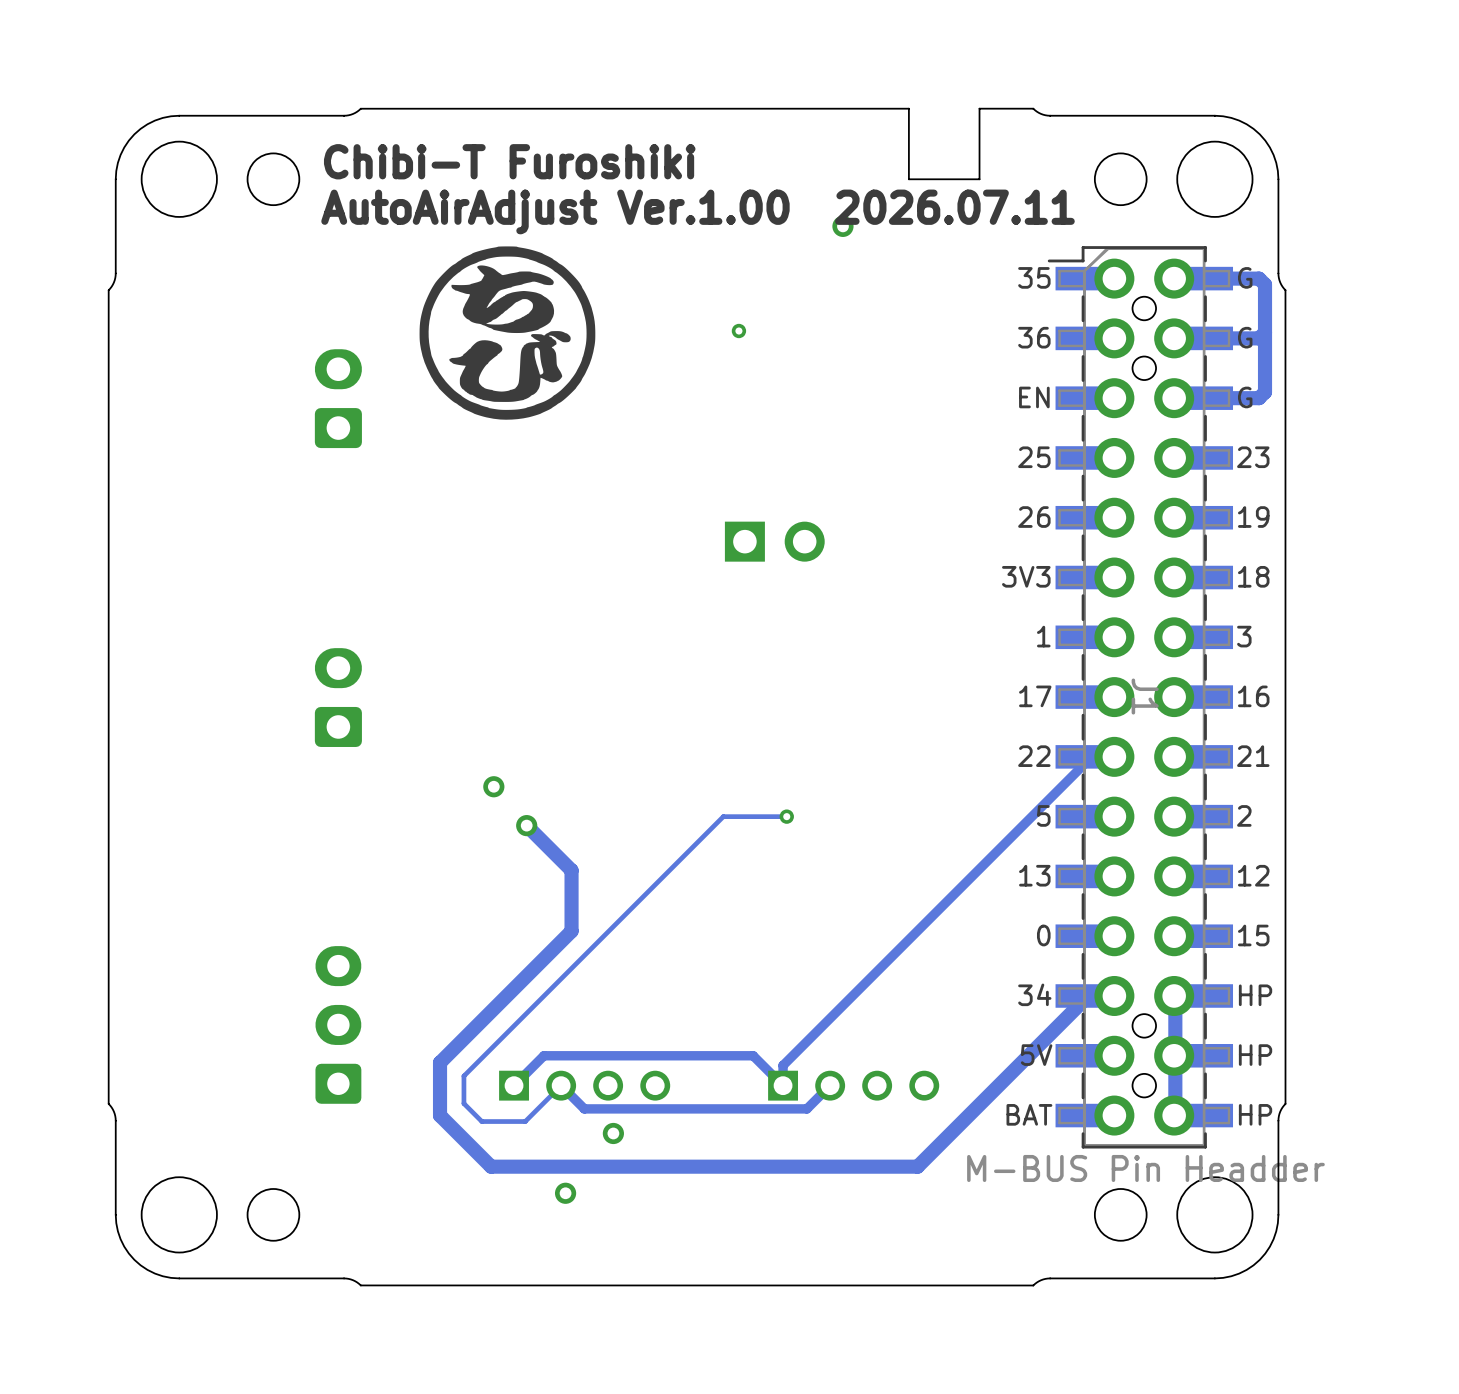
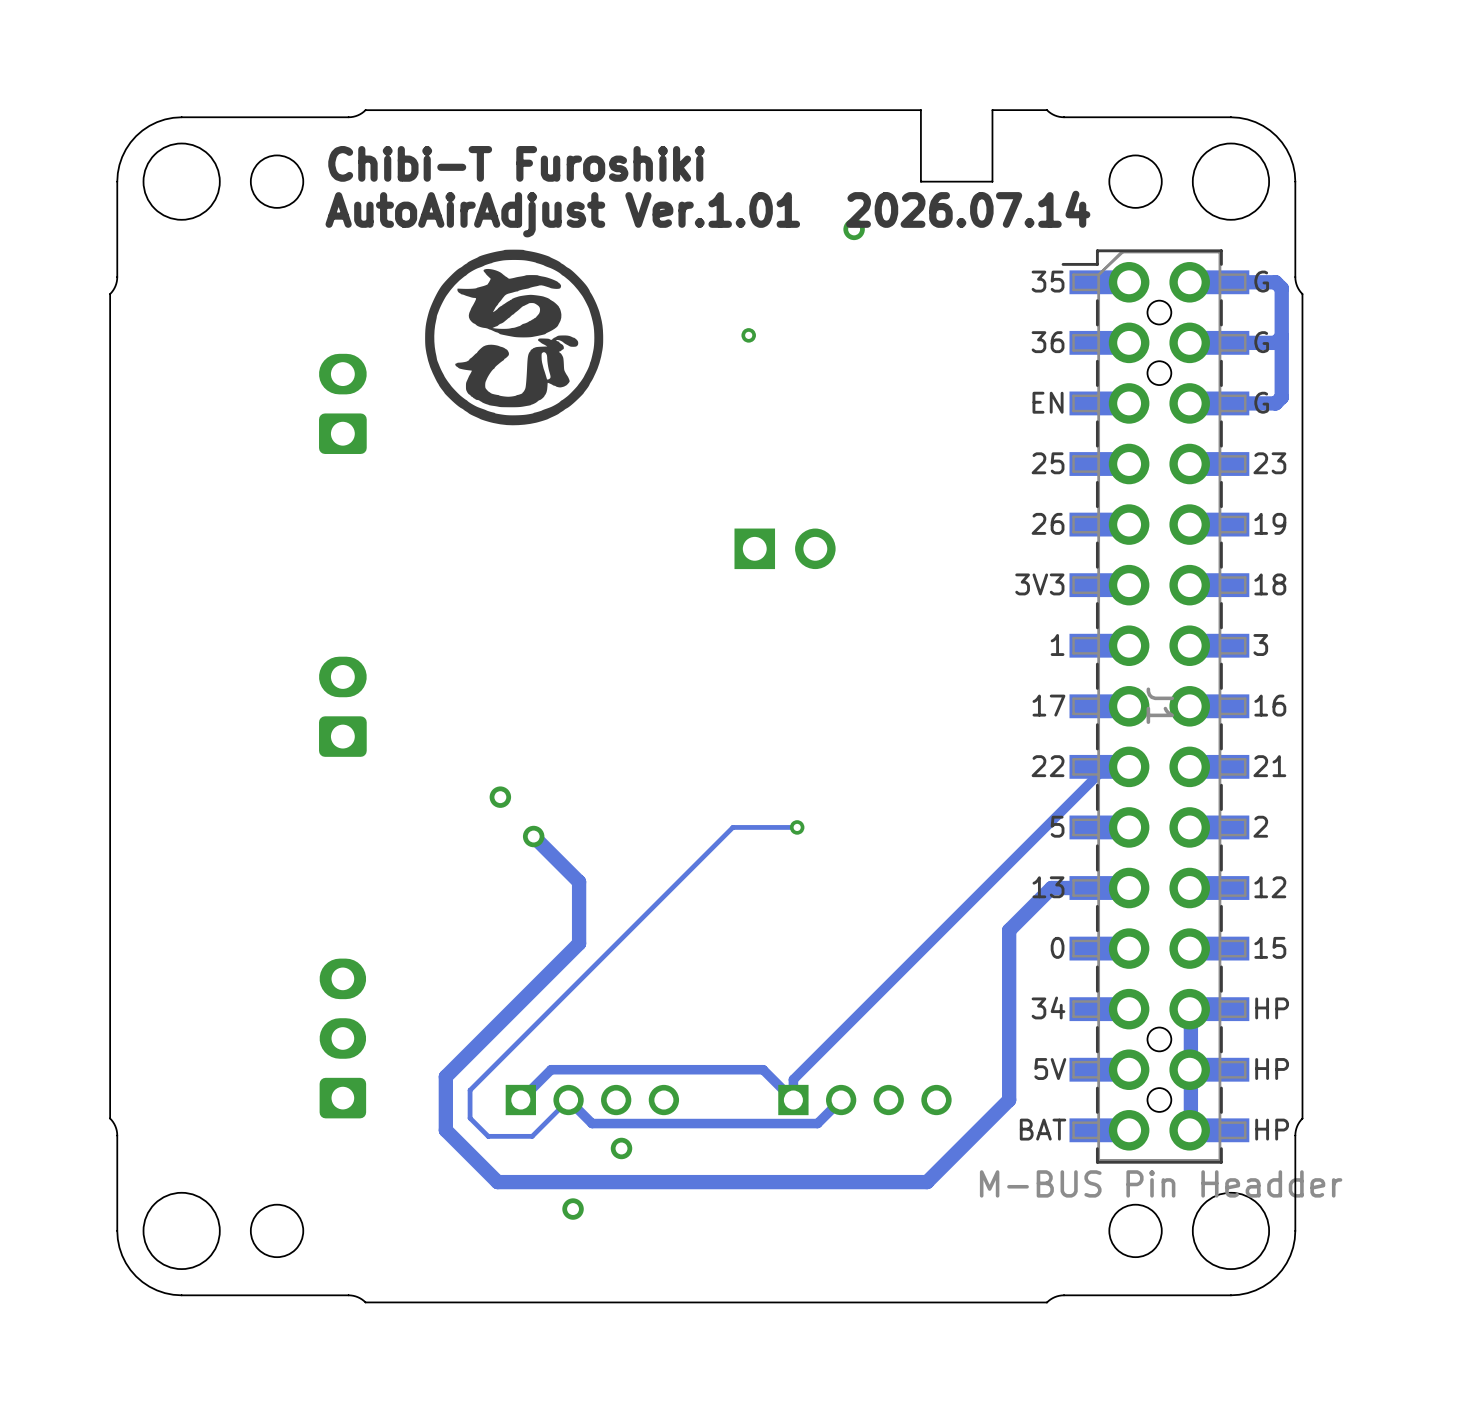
text: AutoAirAdjust Ver.1.00 2026.07.11 (698, 211) -> AutoAirAdjust Ver.1.01 2026.07.14 (707, 214)
track: (1114, 995) (1088, 995) (917, 1166) (914, 1166) -> (1129, 888) (1051, 888) (1009, 930) (1009, 1100) (927, 1182)

